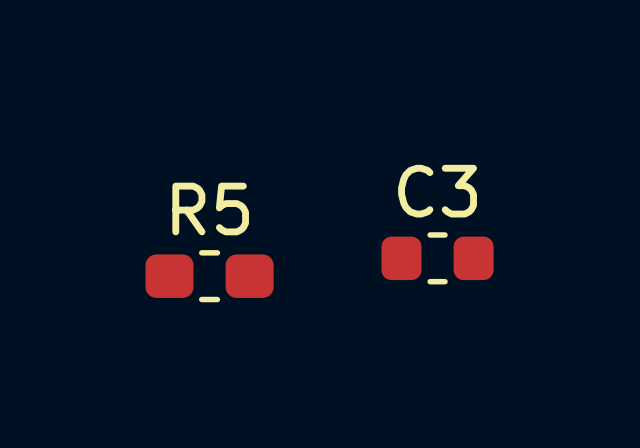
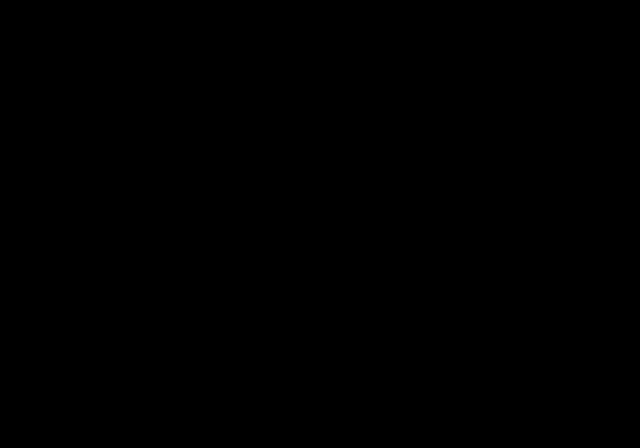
C3: (437, 258) -> none
R5: (209, 276) -> none

